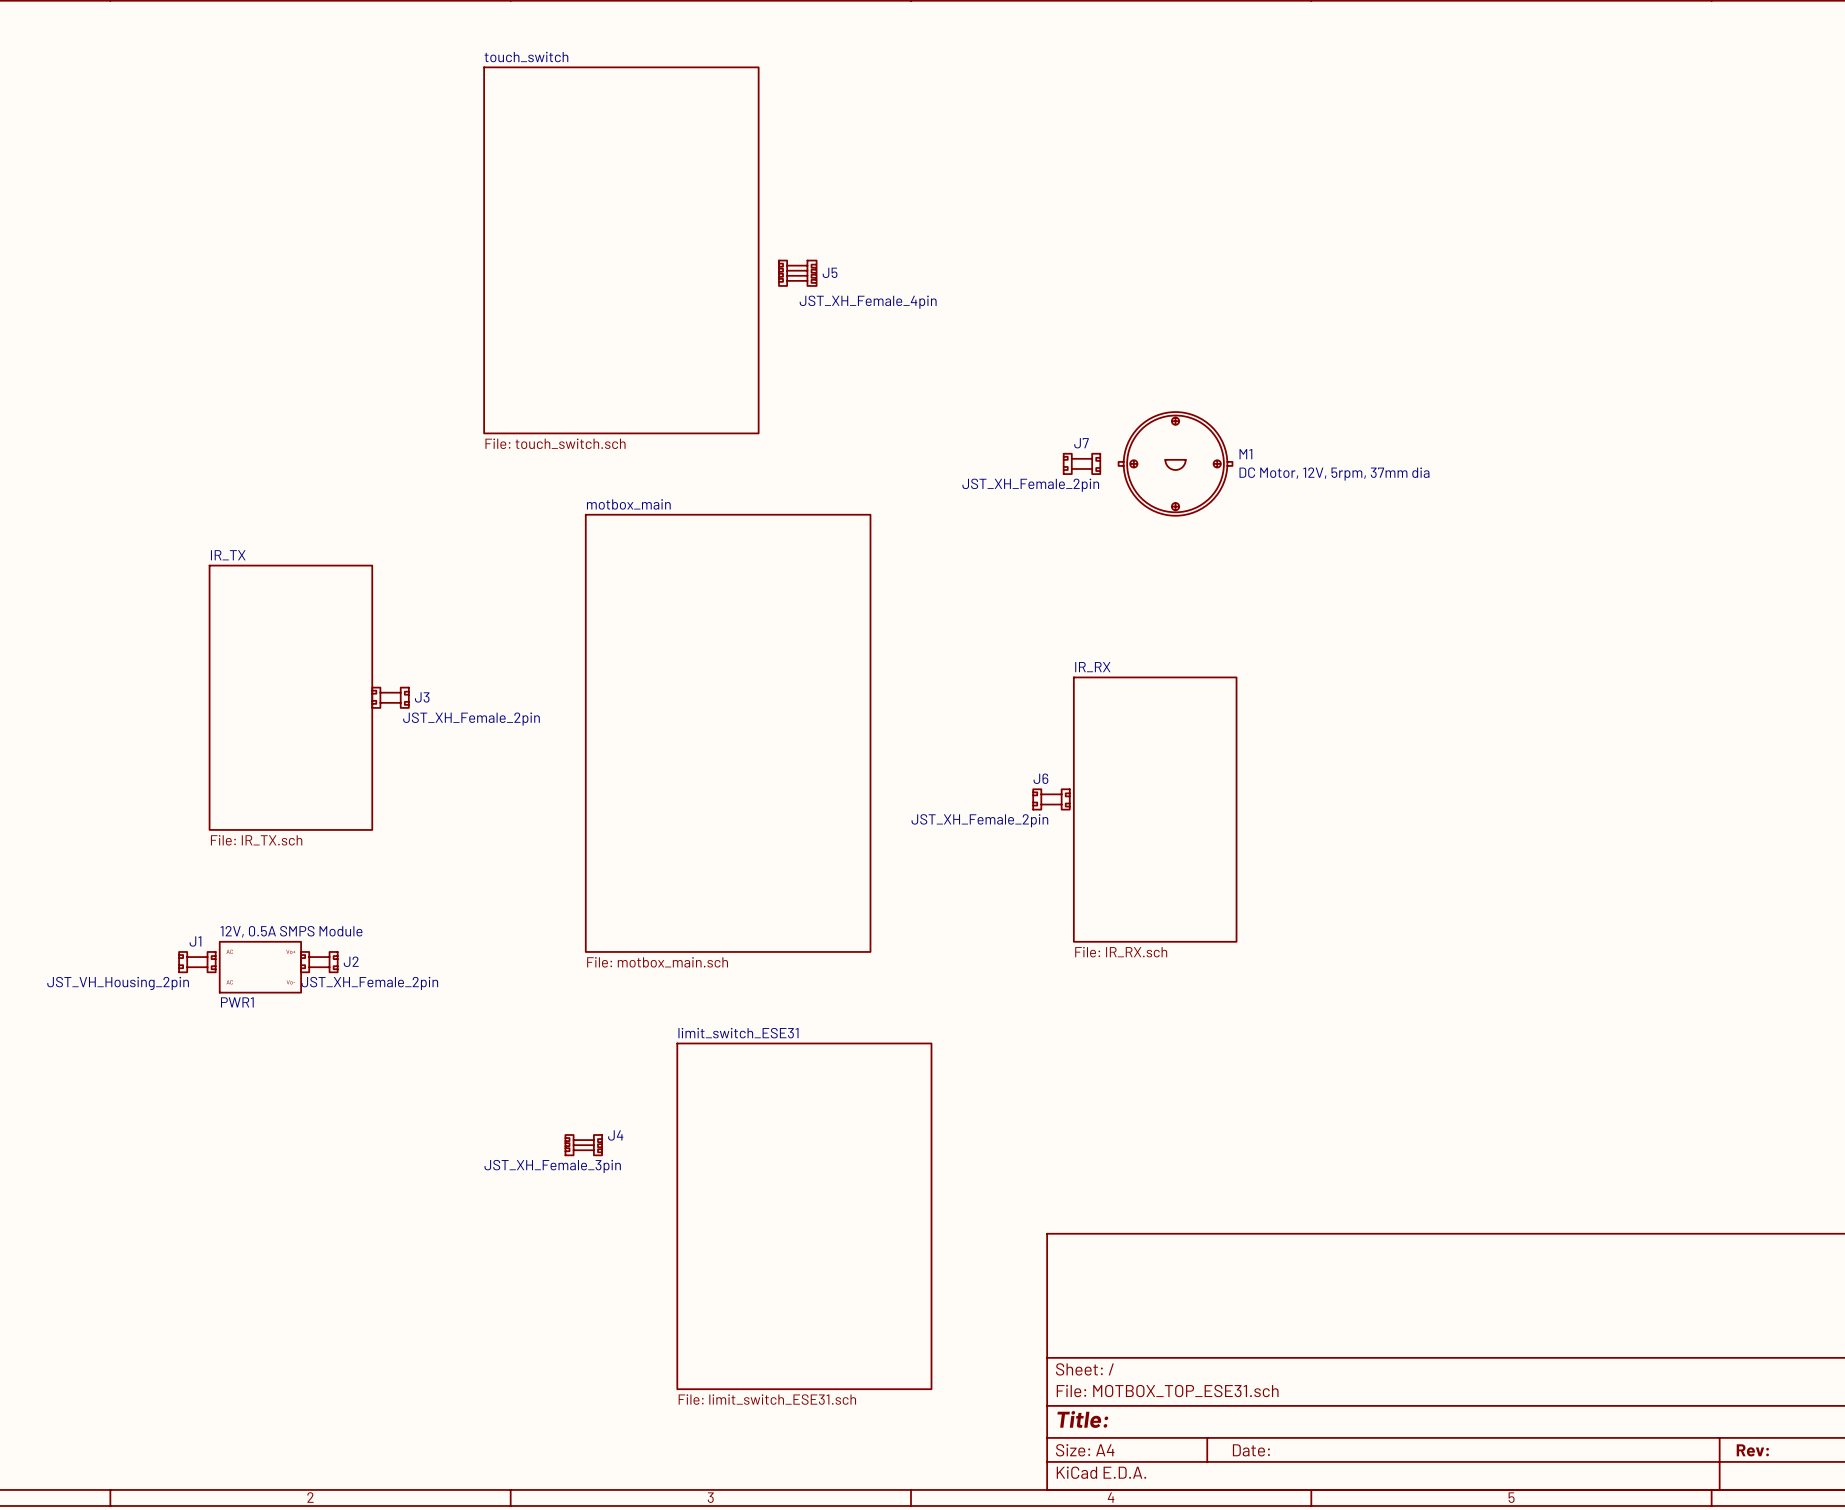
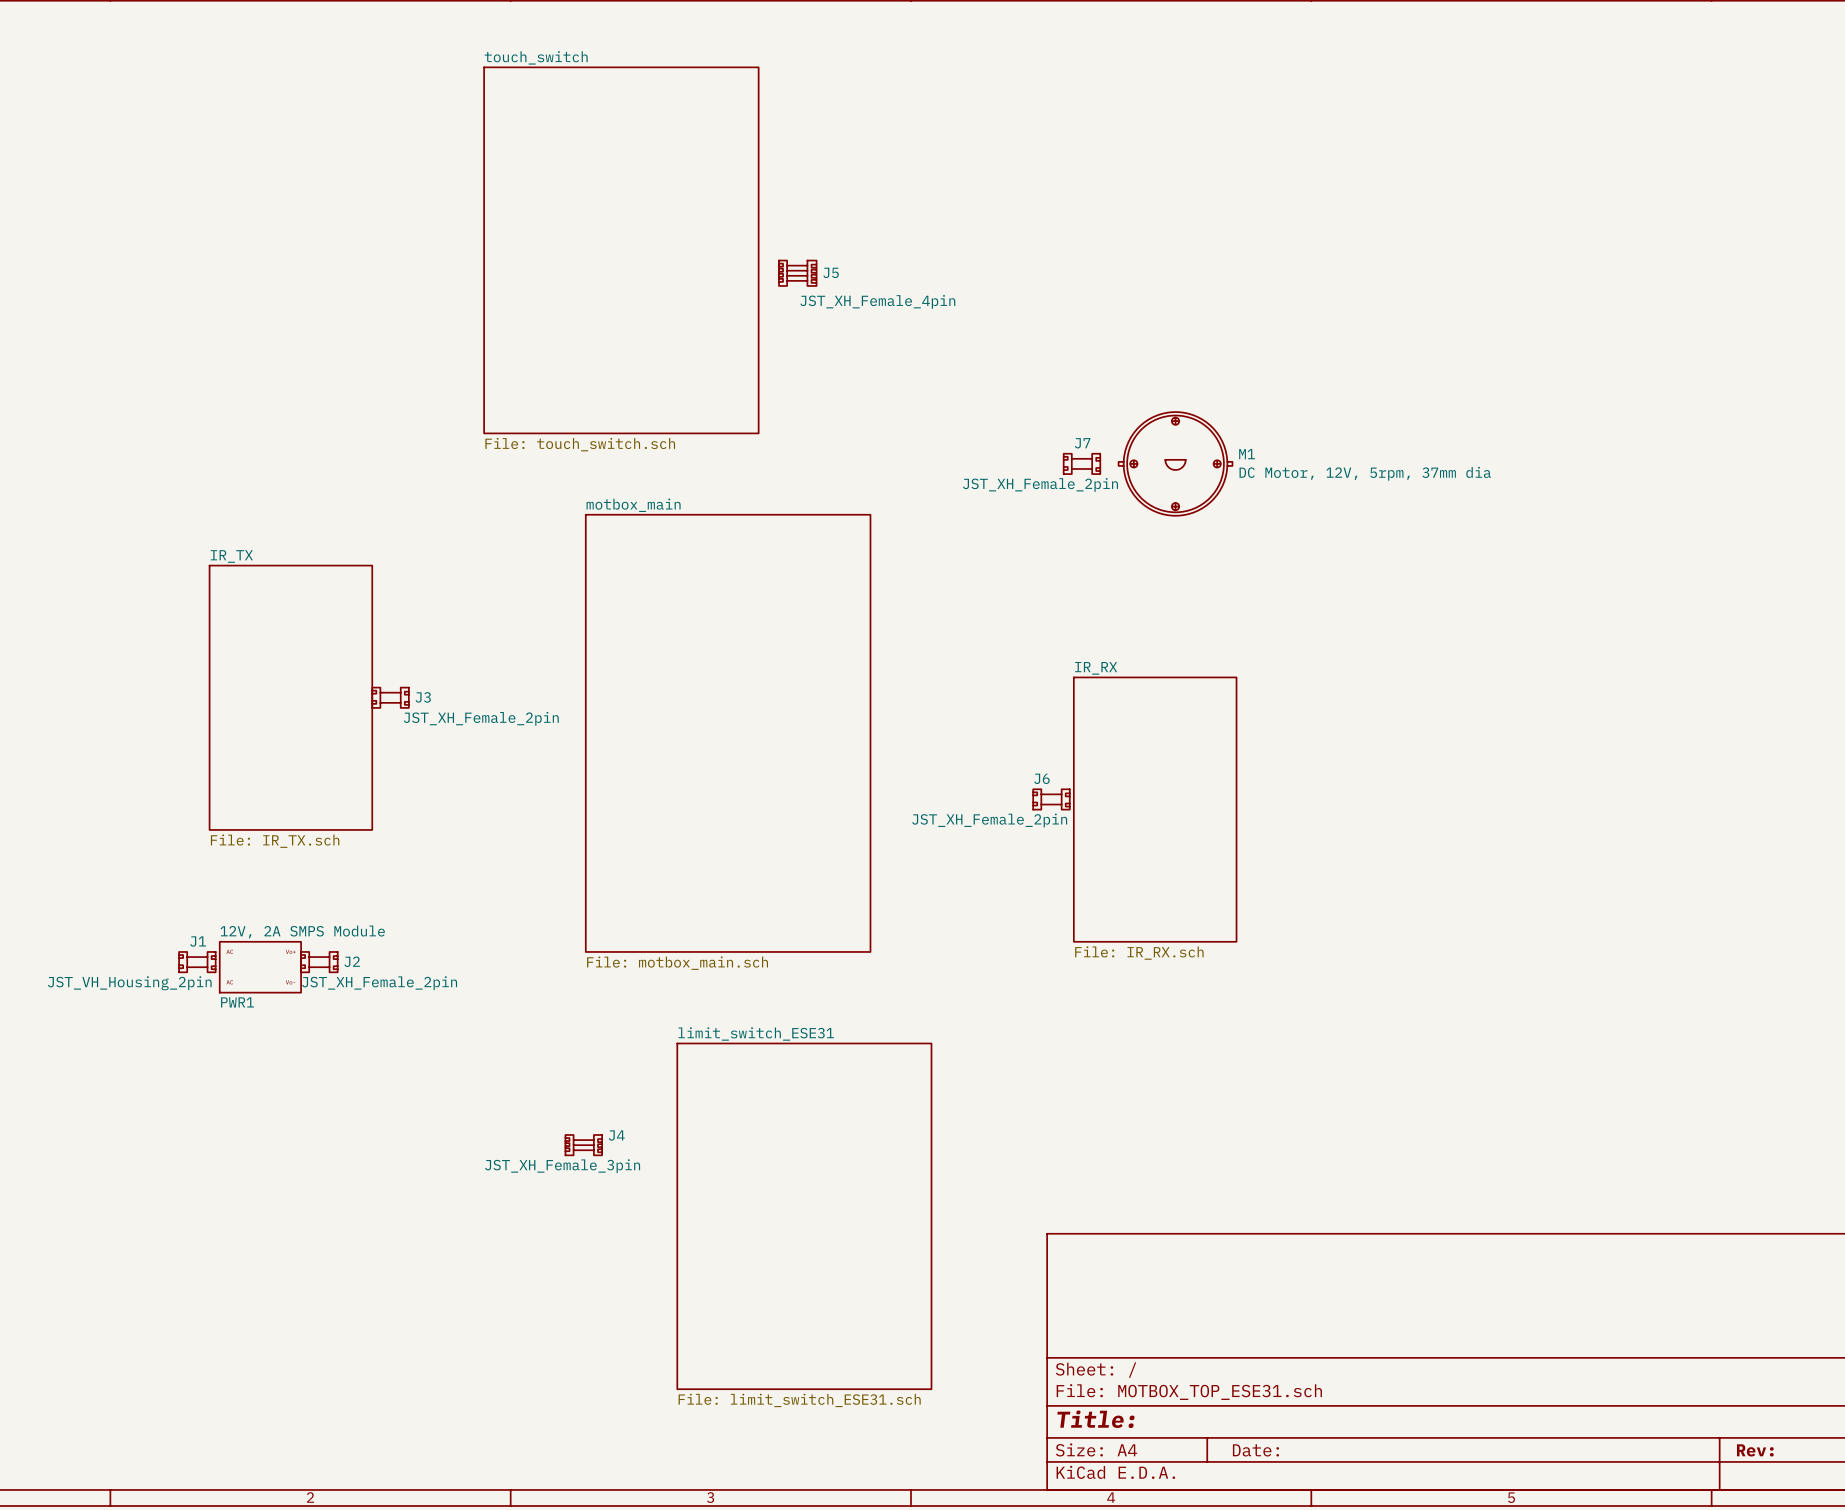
PWR1 value: 12V, 0.5A SMPS Module (291, 931) -> 12V, 2A SMPS Module (302, 931)

